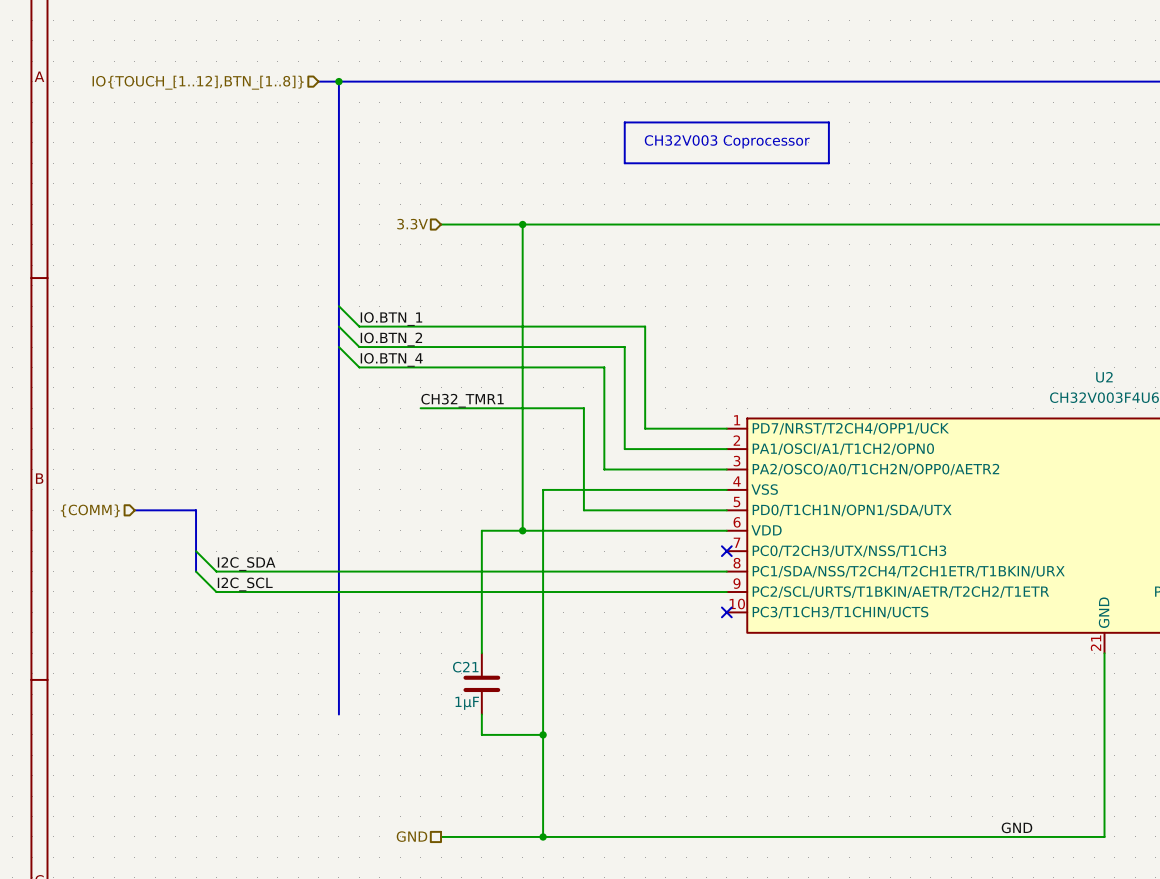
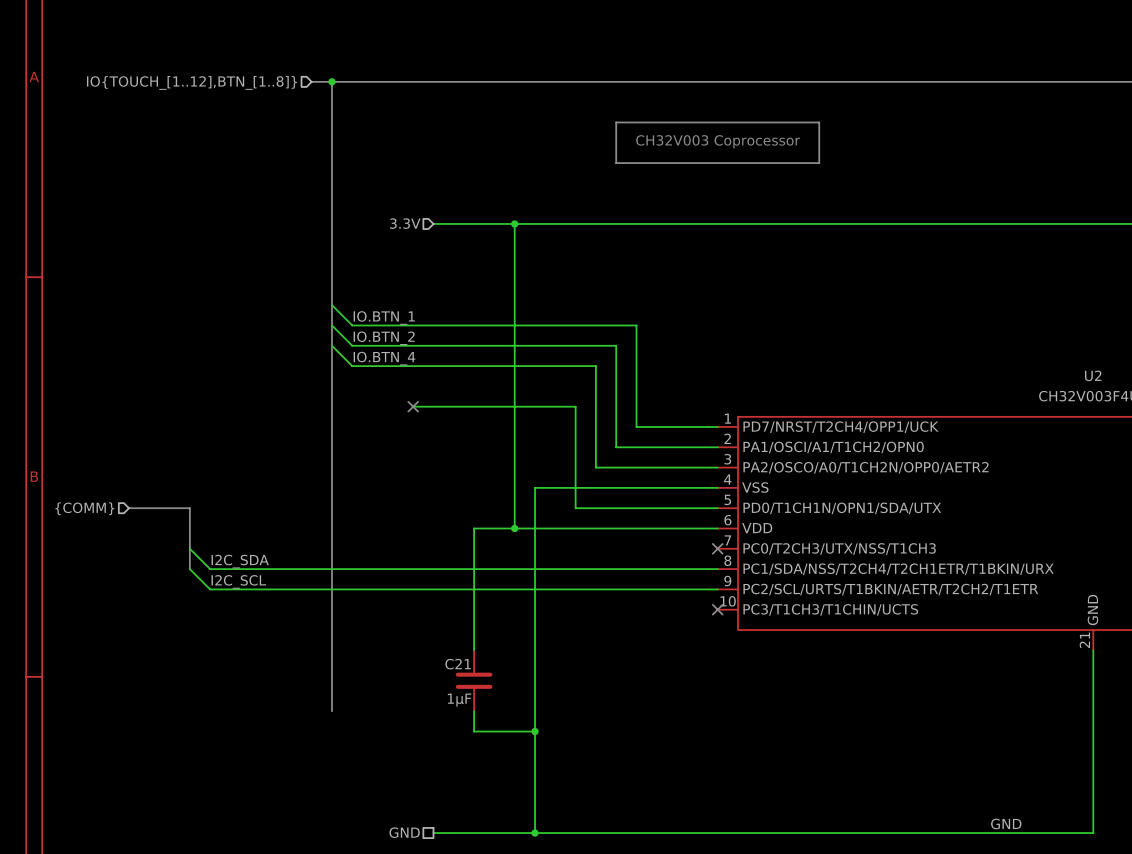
label: CH32_TMR1 (462, 400) -> none
no-connect mark: none -> (413, 406)

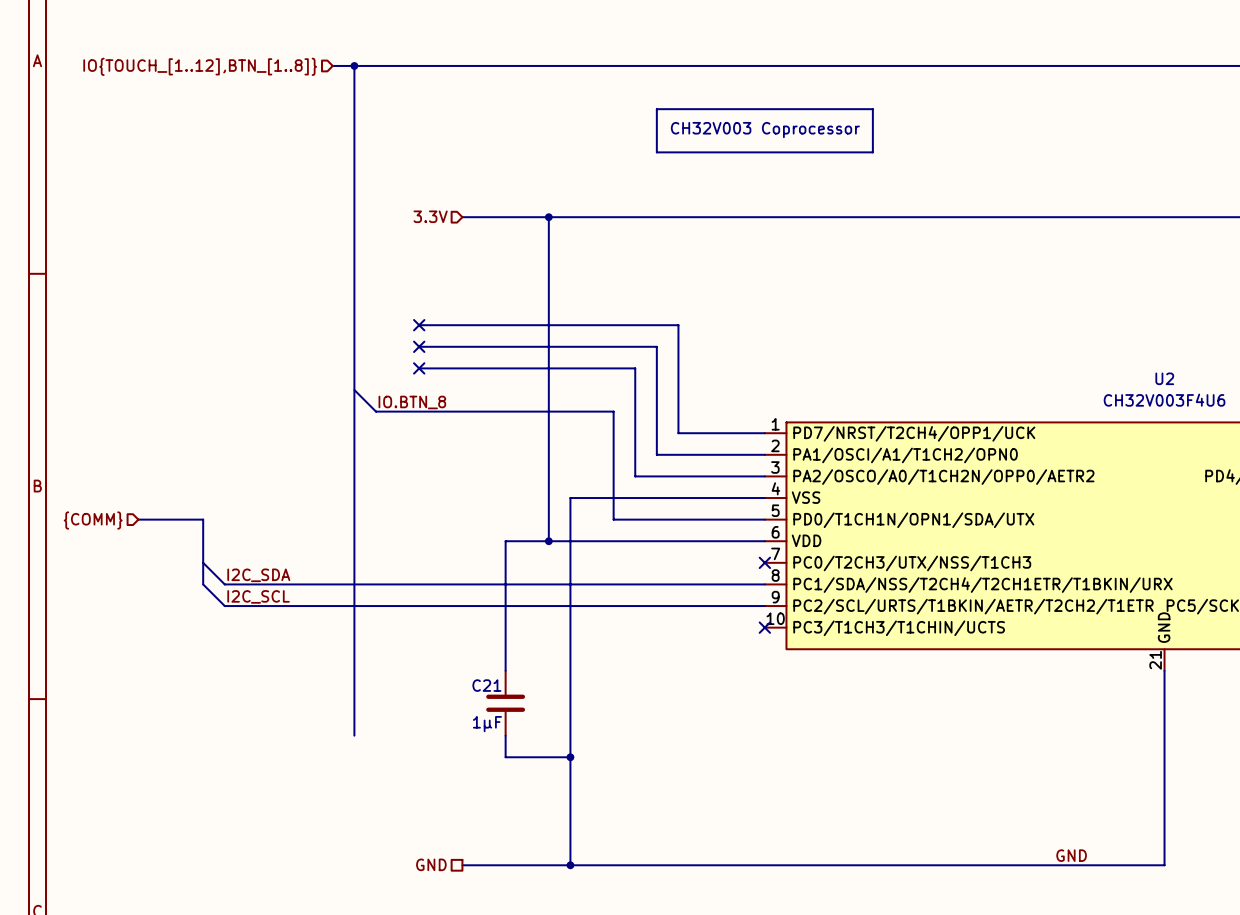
wire: (331, 305) (352, 325) (392, 325) -> none
label: IO.BTN_1 (384, 317) -> none
wire: (331, 325) (352, 345) (392, 345) -> none
no-connect mark: none -> (419, 325)
label: IO.BTN_2 (384, 338) -> none
wire: (331, 345) (352, 366) (392, 366) -> none
no-connect mark: none -> (419, 346)
label: IO.BTN_4 (384, 358) -> none
no-connect mark: none -> (419, 368)
wire: none -> (354, 390) (376, 411) (440, 411)
label: none -> IO.BTN_8 (412, 402)
no-connect mark: (413, 406) -> none

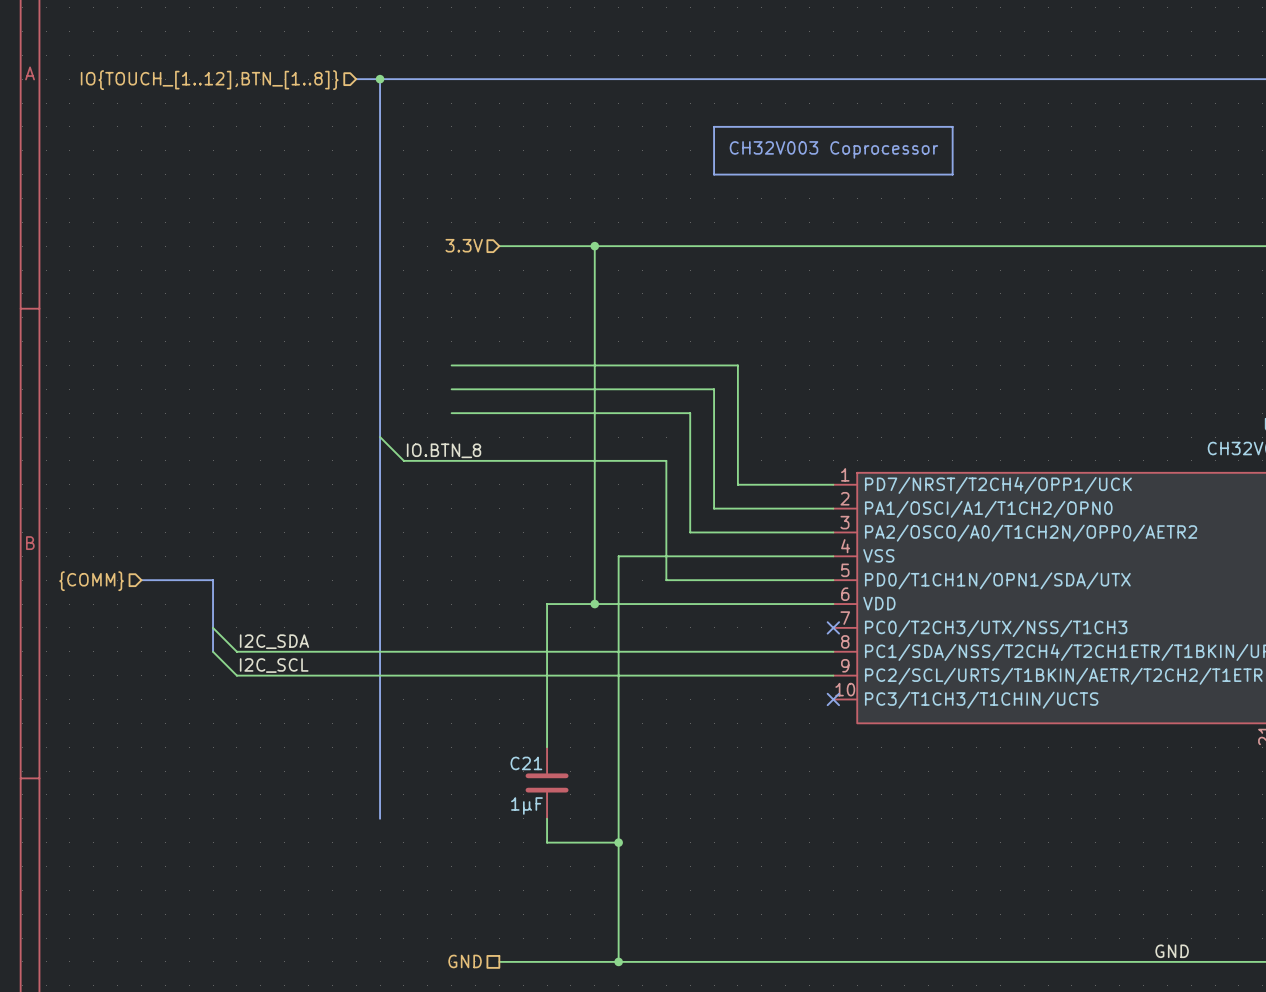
no-connect mark: (419, 325) -> none
no-connect mark: (419, 346) -> none
no-connect mark: (419, 368) -> none

